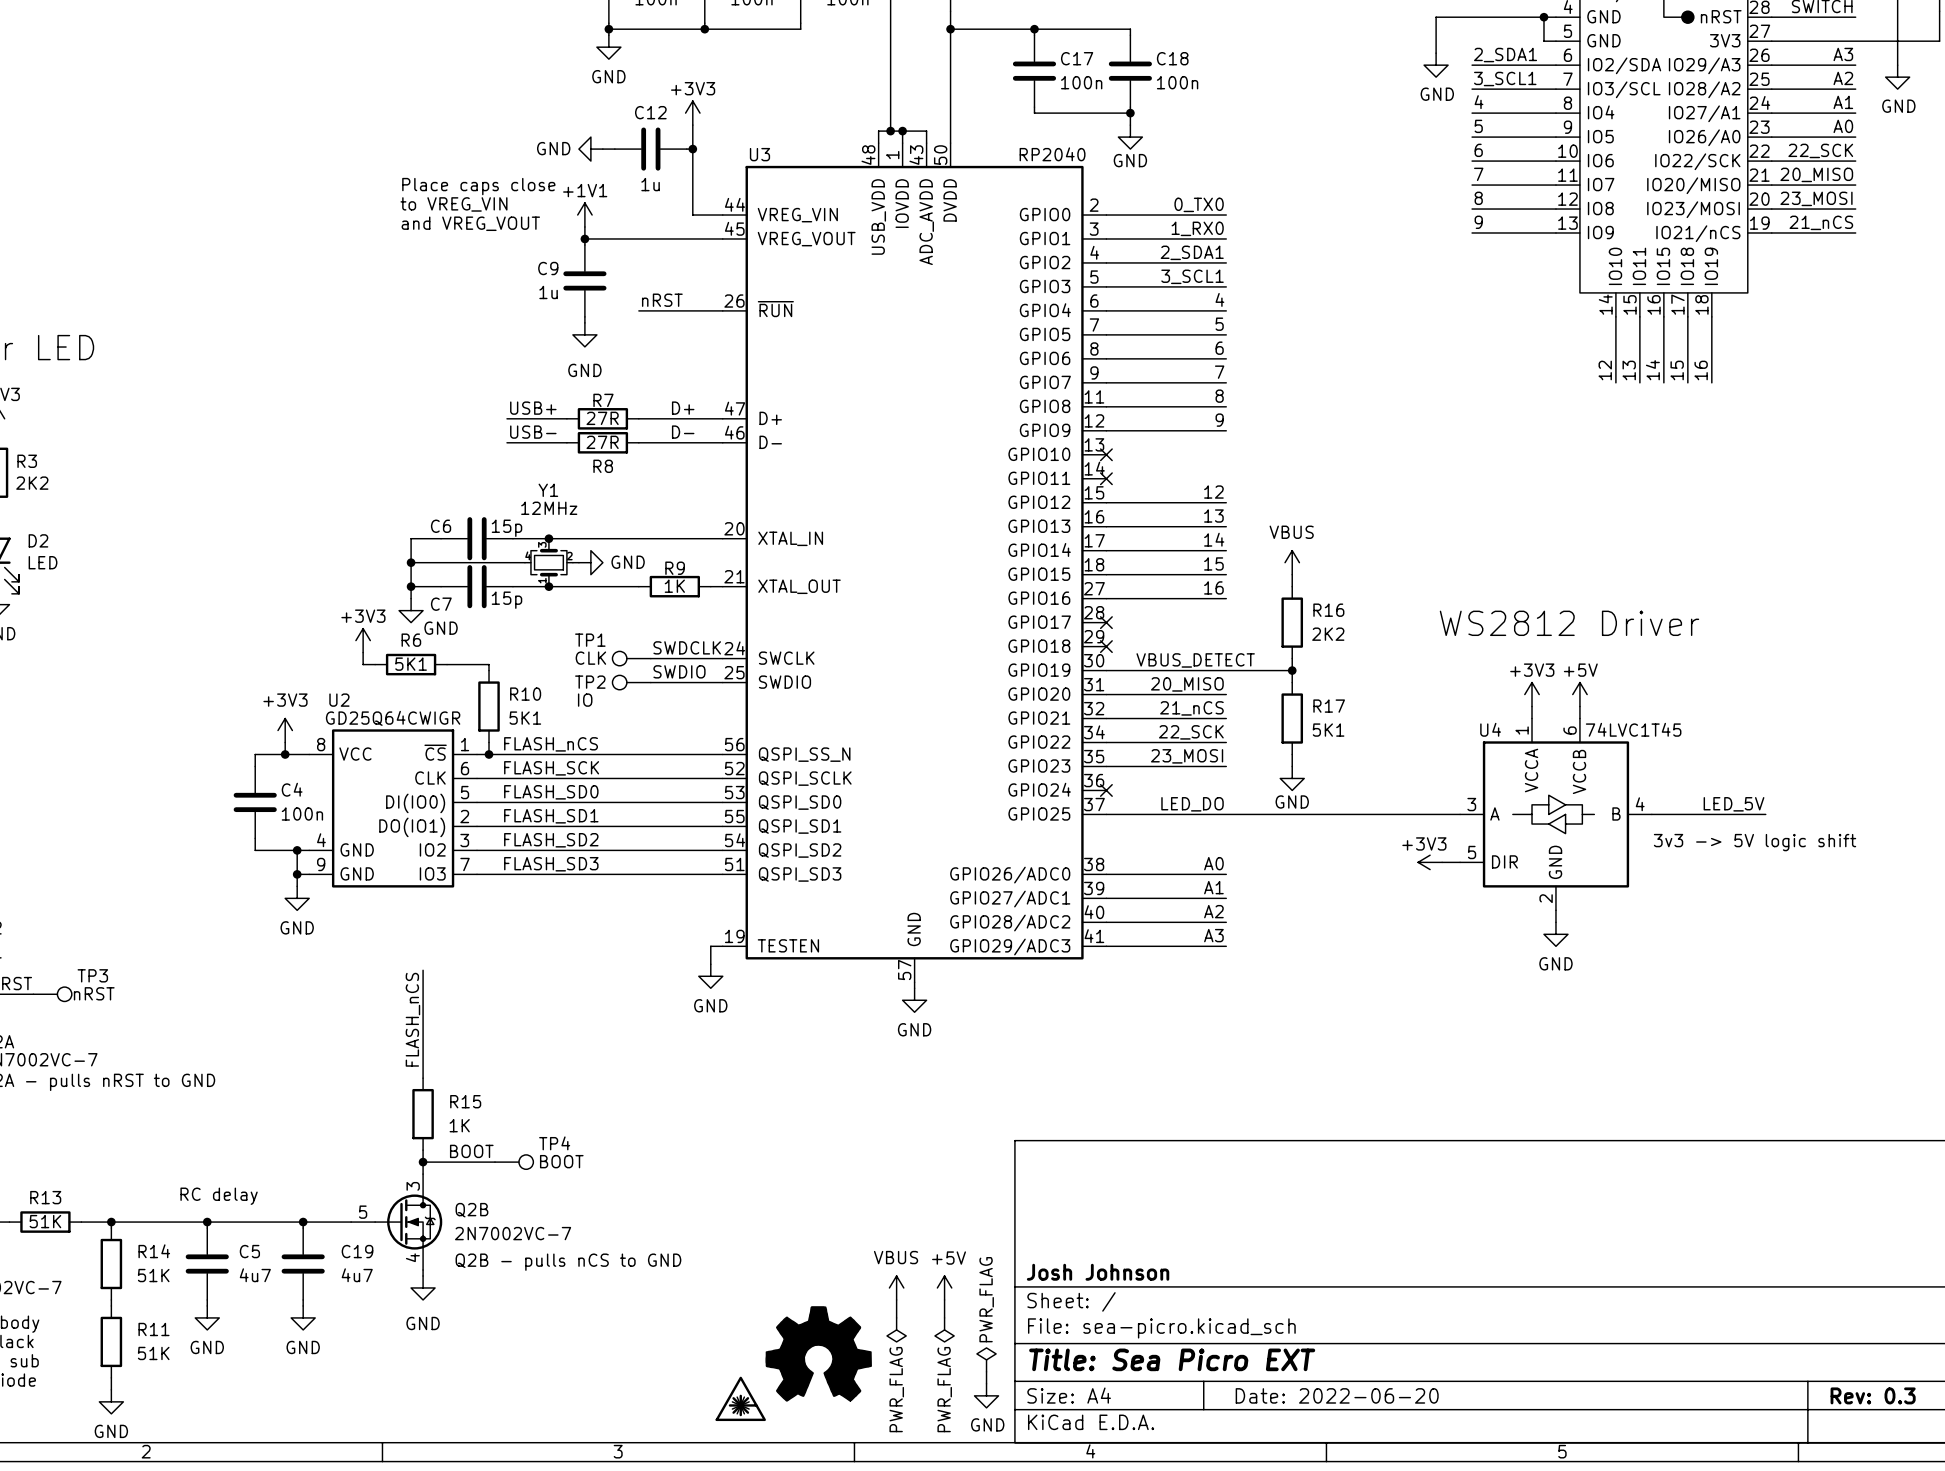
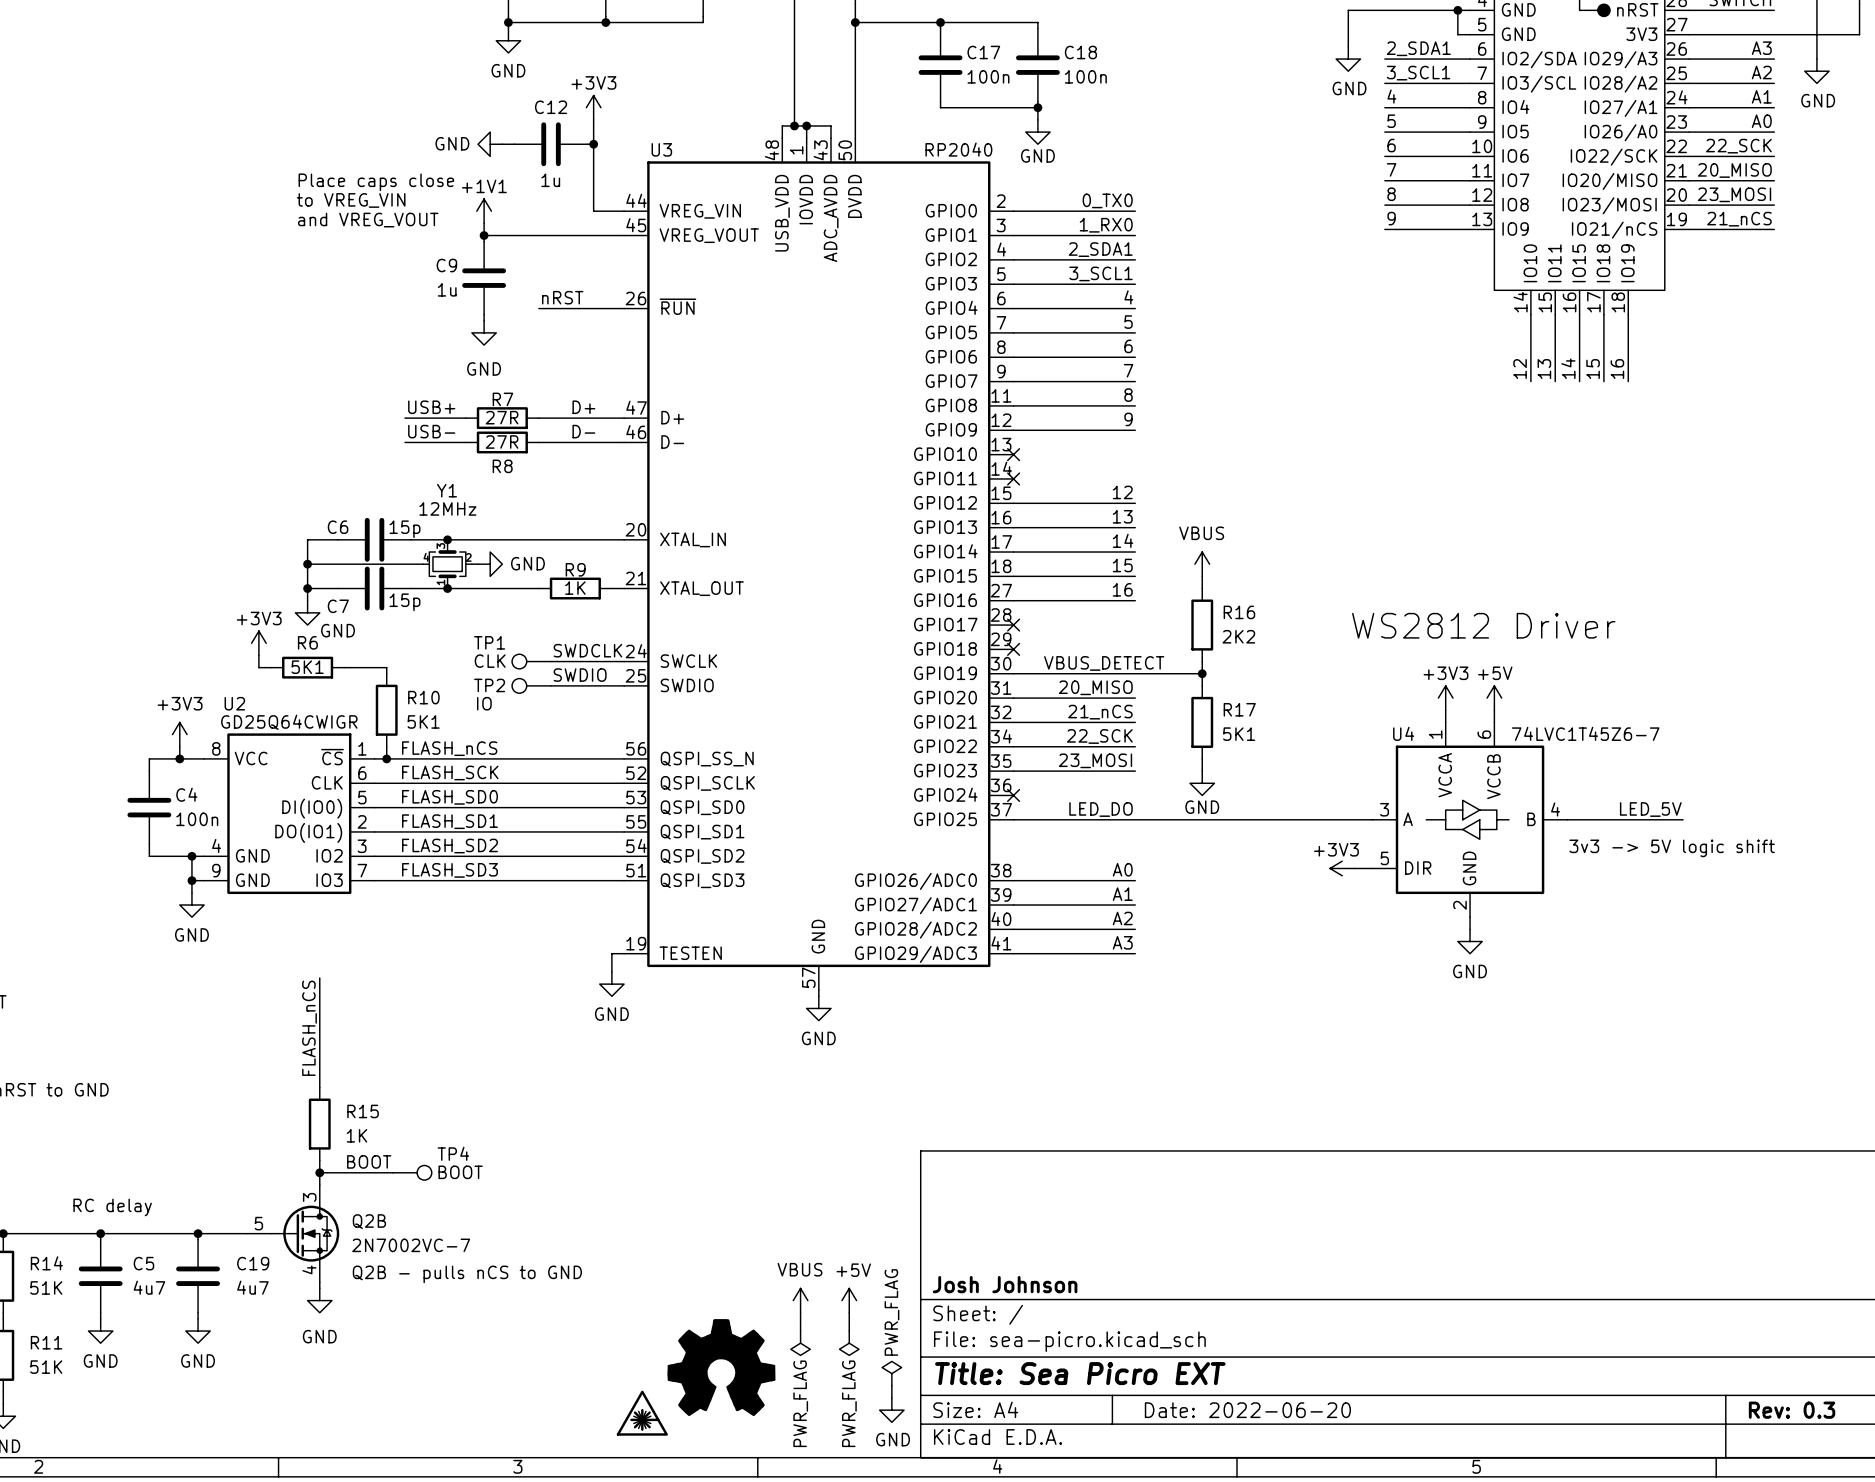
U4 value: 74LVC1T45 (1633, 729) -> 74LVC1T45Z6-7 (1585, 733)

